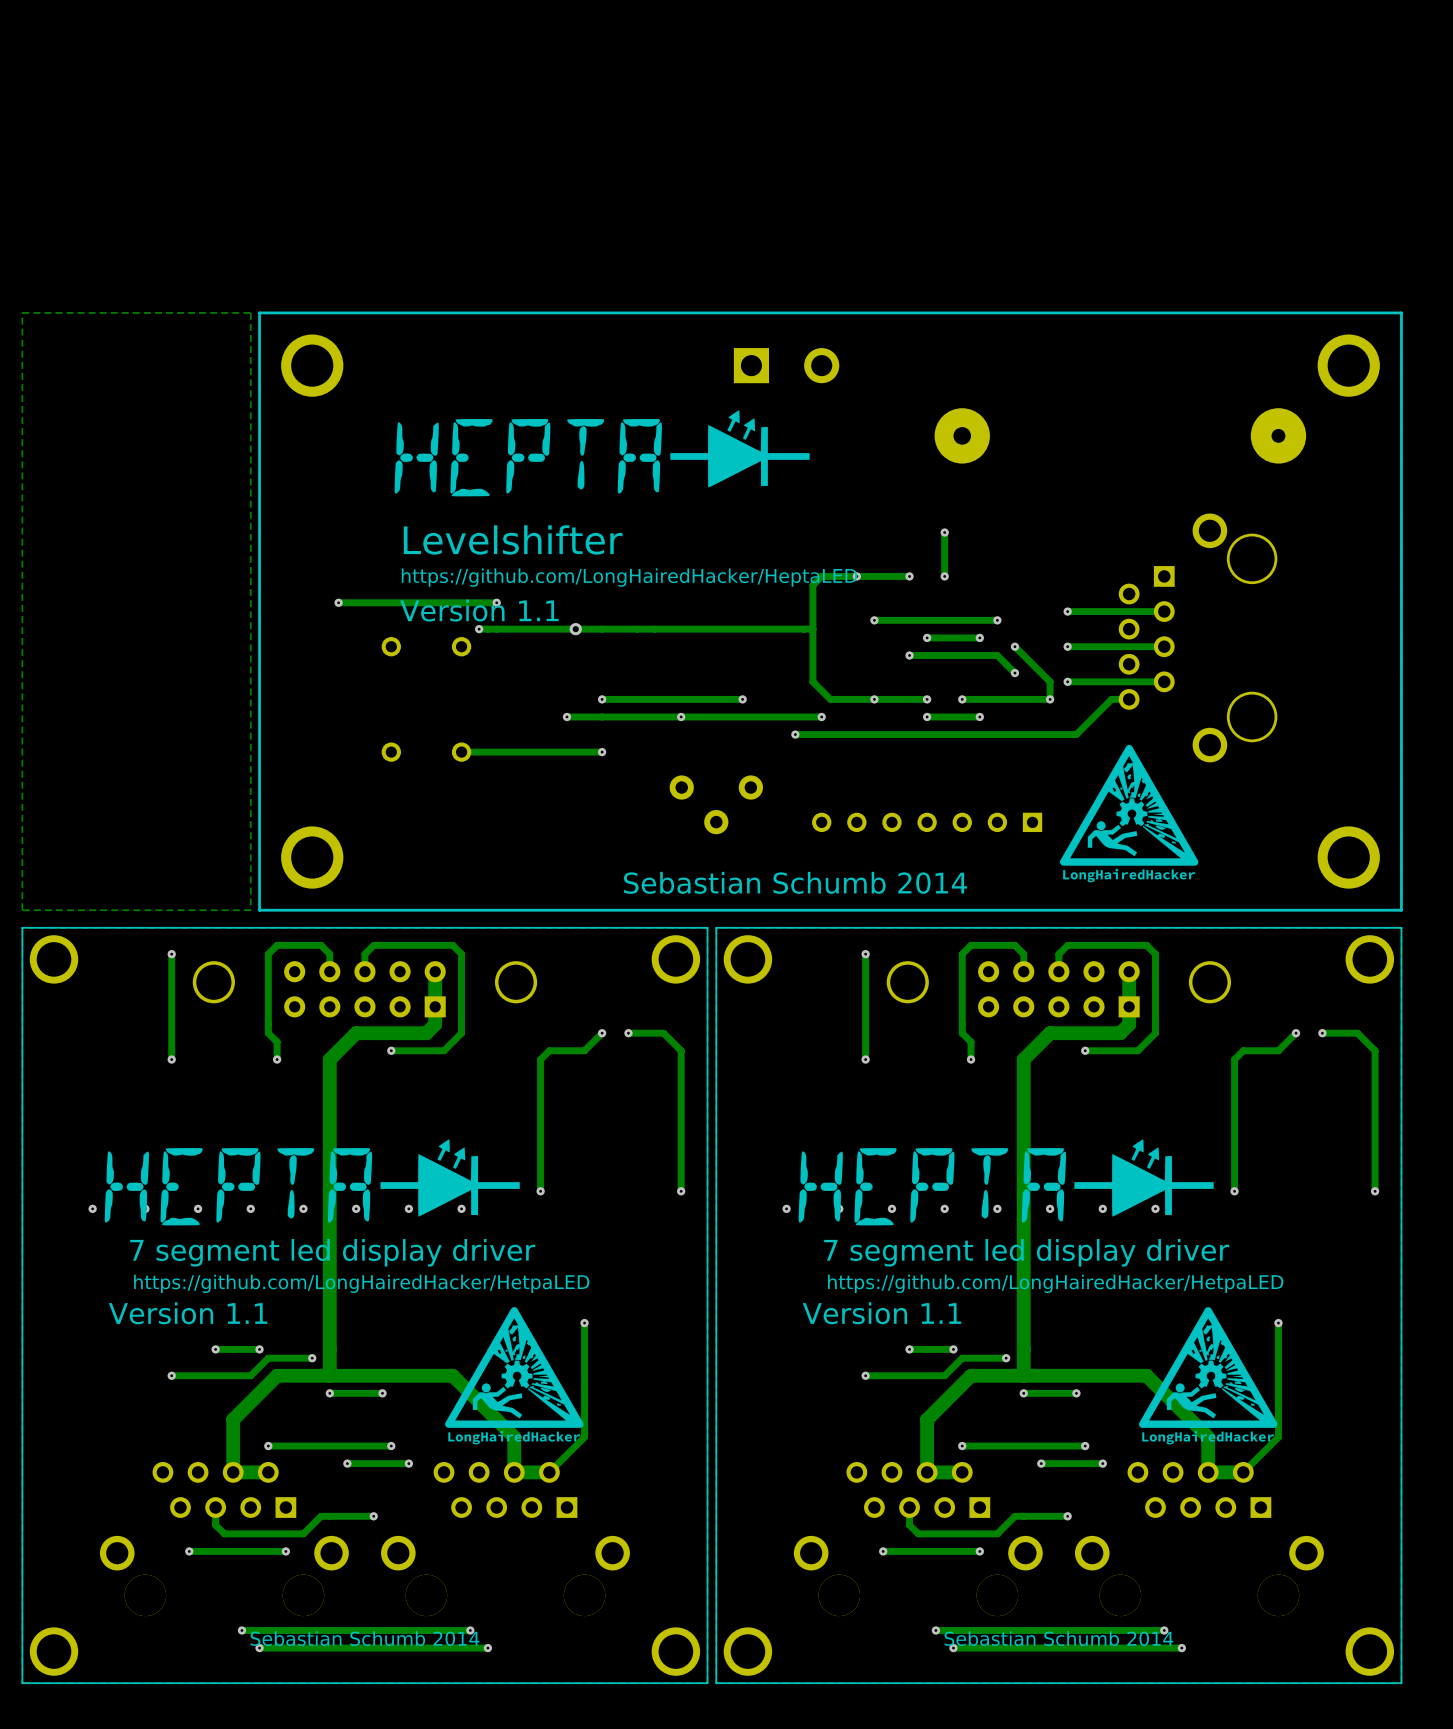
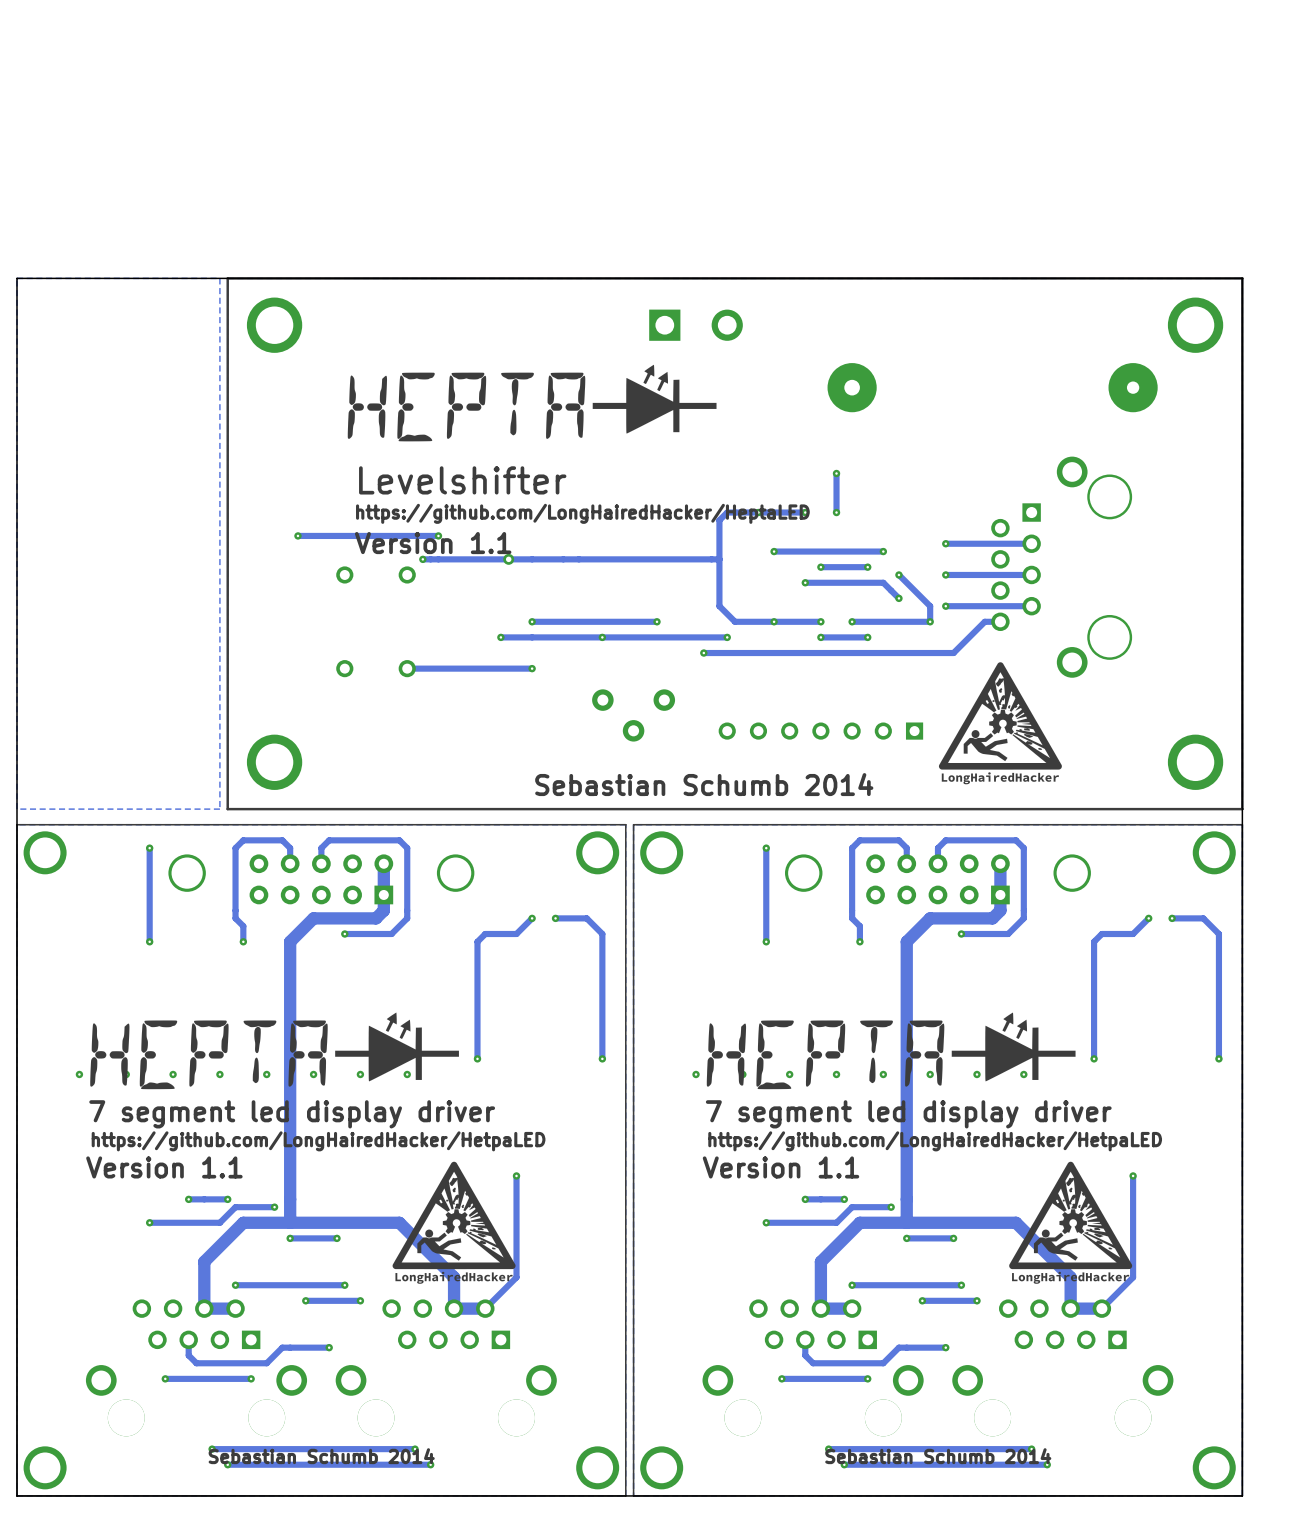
board edge: none -> (1242, 278) (16, 278) (16, 1495) (1242, 1495) (1242, 278)

